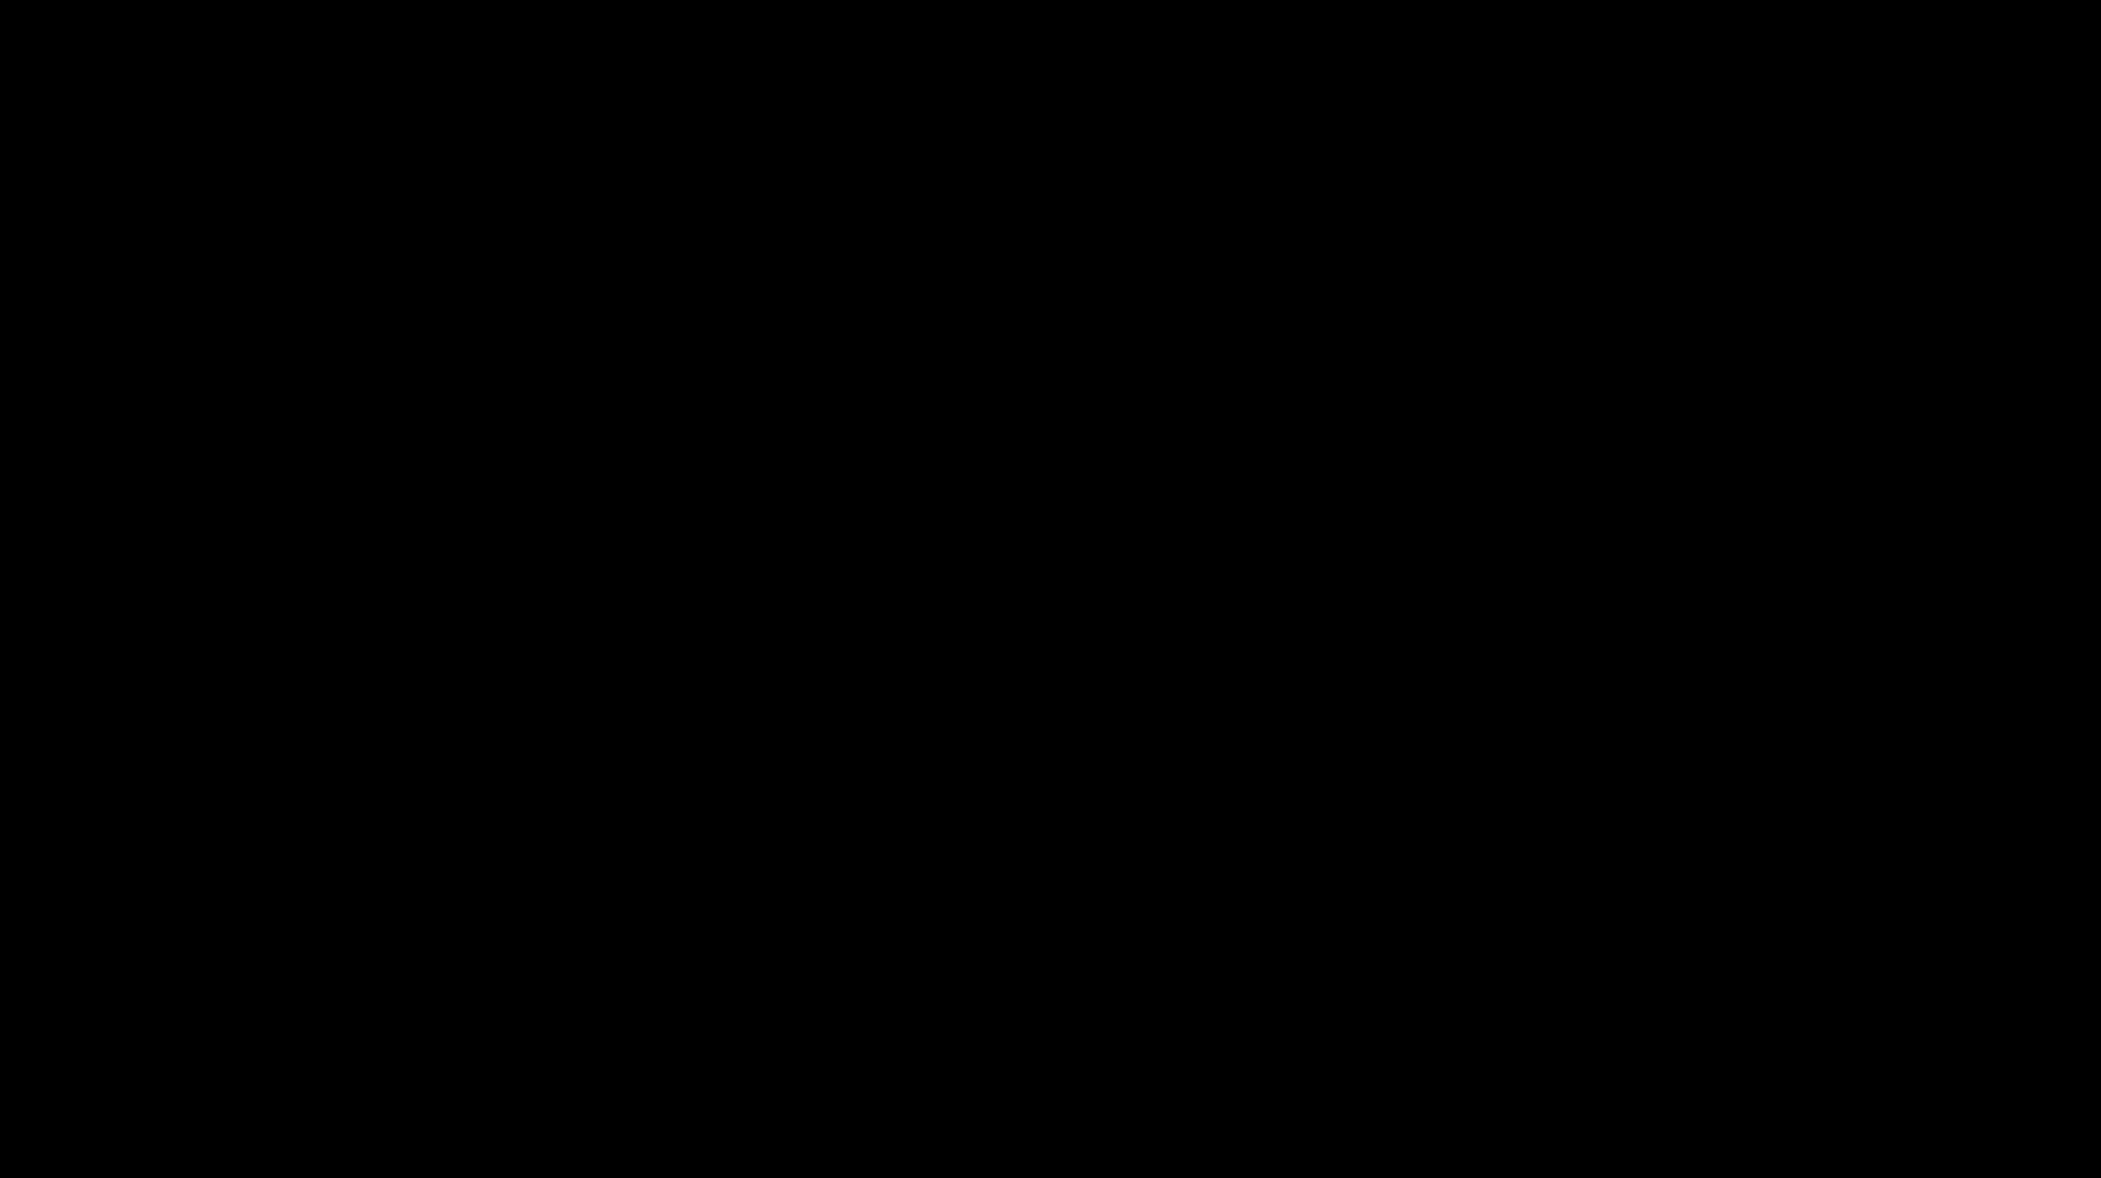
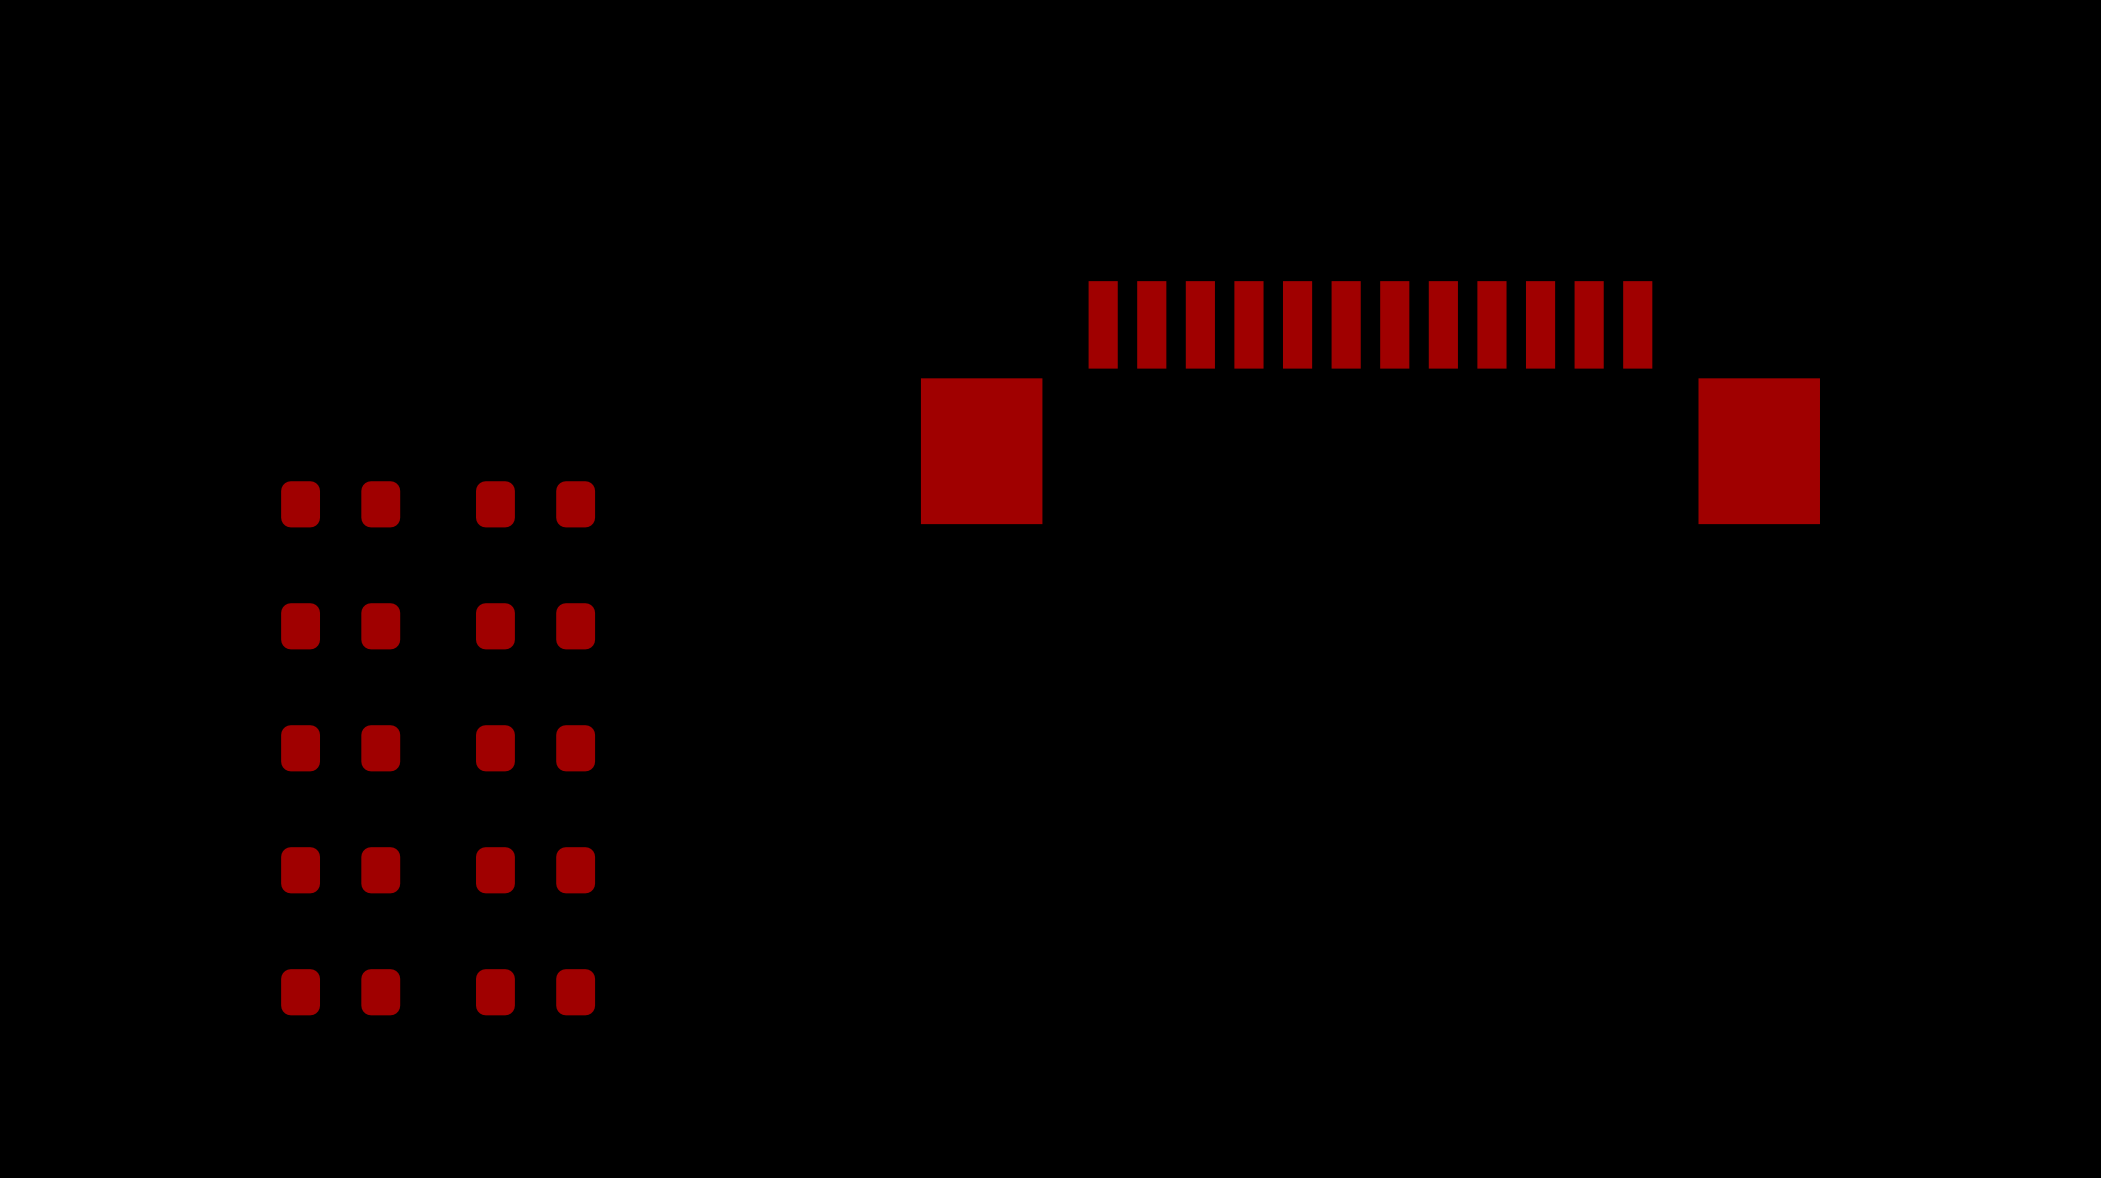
part: none -> (1370, 402)
part: none -> (340, 504)
part: none -> (535, 504)
part: none -> (340, 626)
part: none -> (535, 626)
part: none -> (340, 748)
part: none -> (535, 748)
part: none -> (340, 870)
part: none -> (535, 870)
part: none -> (340, 992)
part: none -> (535, 992)

